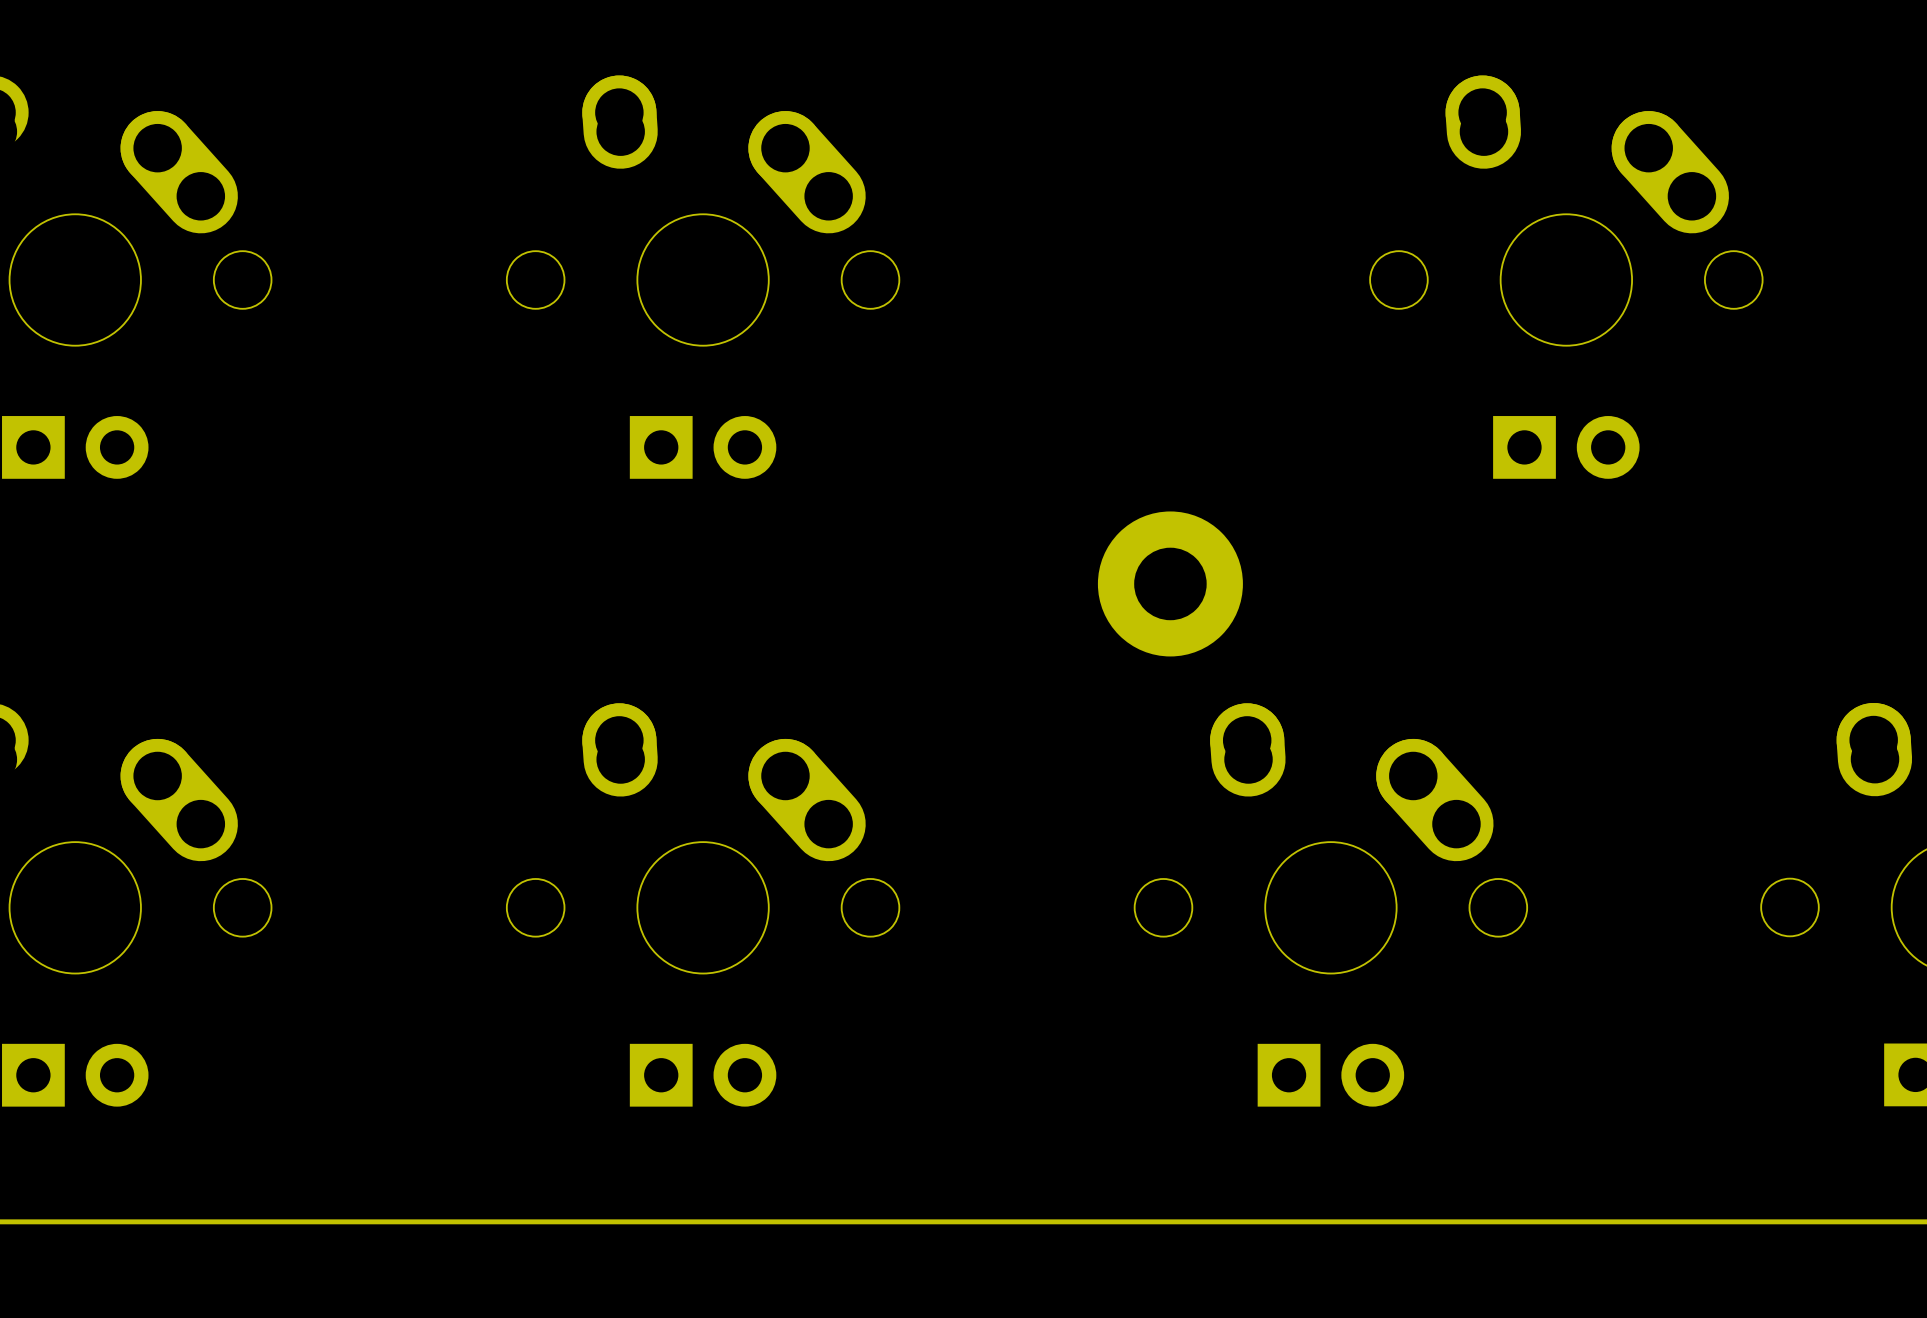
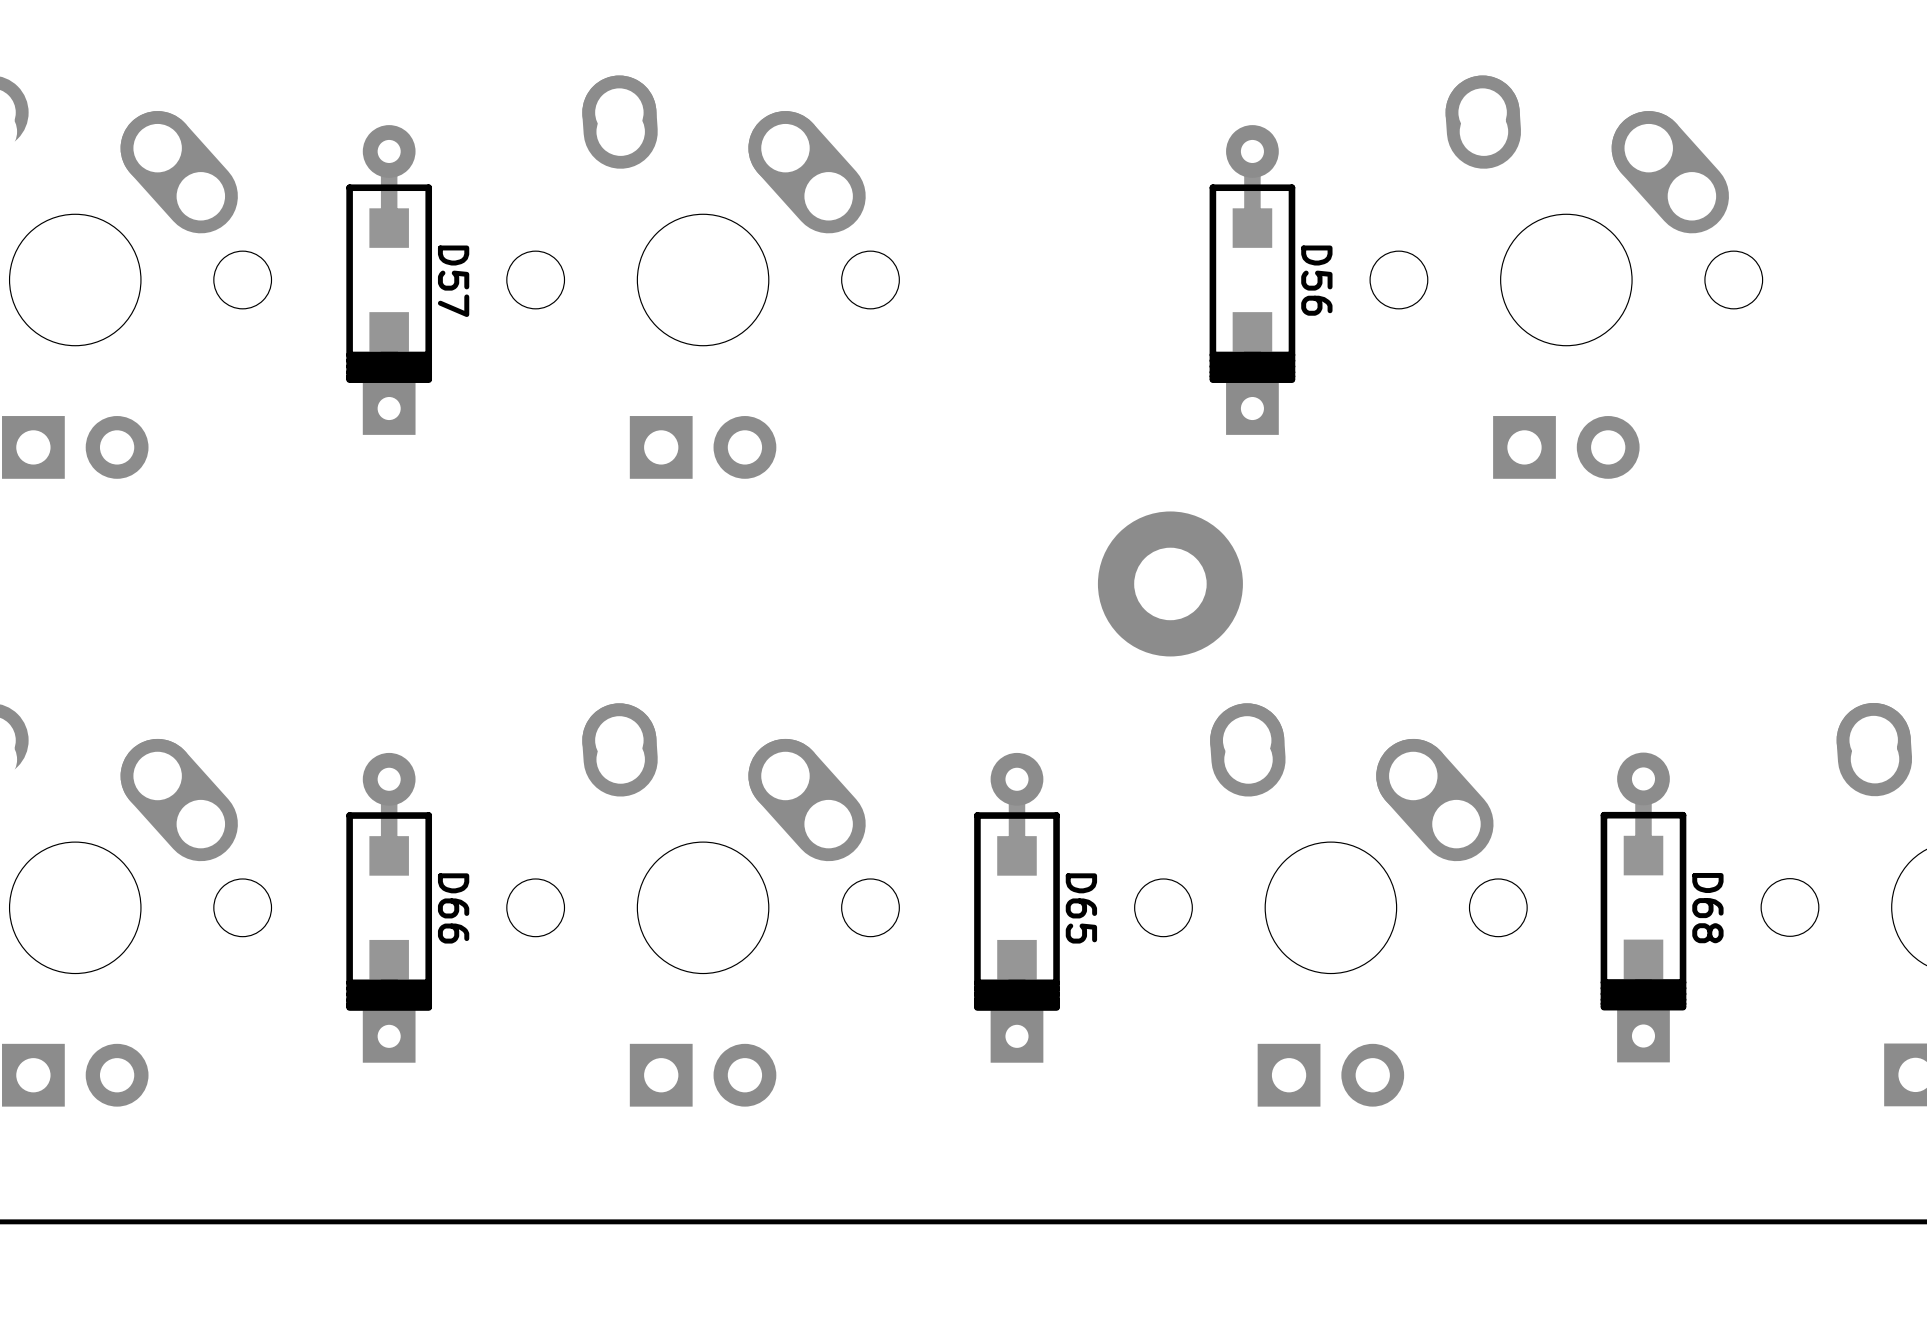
D57: none -> (389, 279)
D56: none -> (1252, 279)
D66: none -> (389, 907)
D65: none -> (1016, 907)
D68: none -> (1643, 907)

